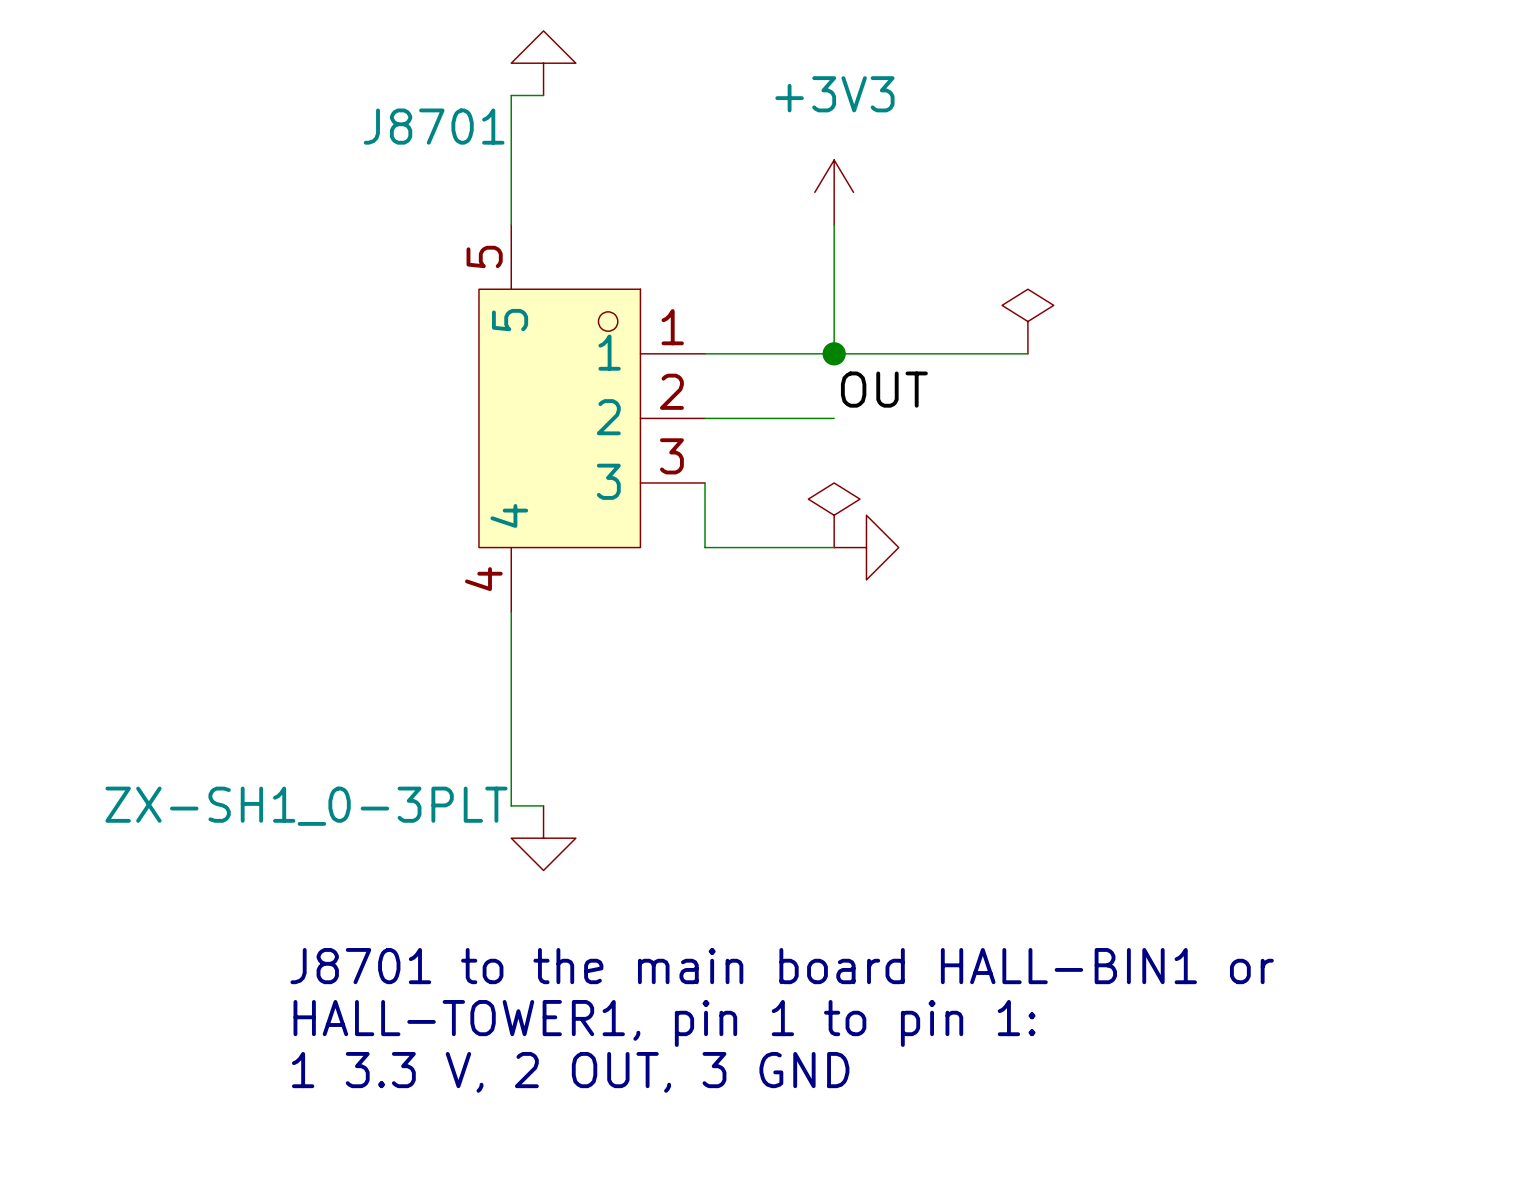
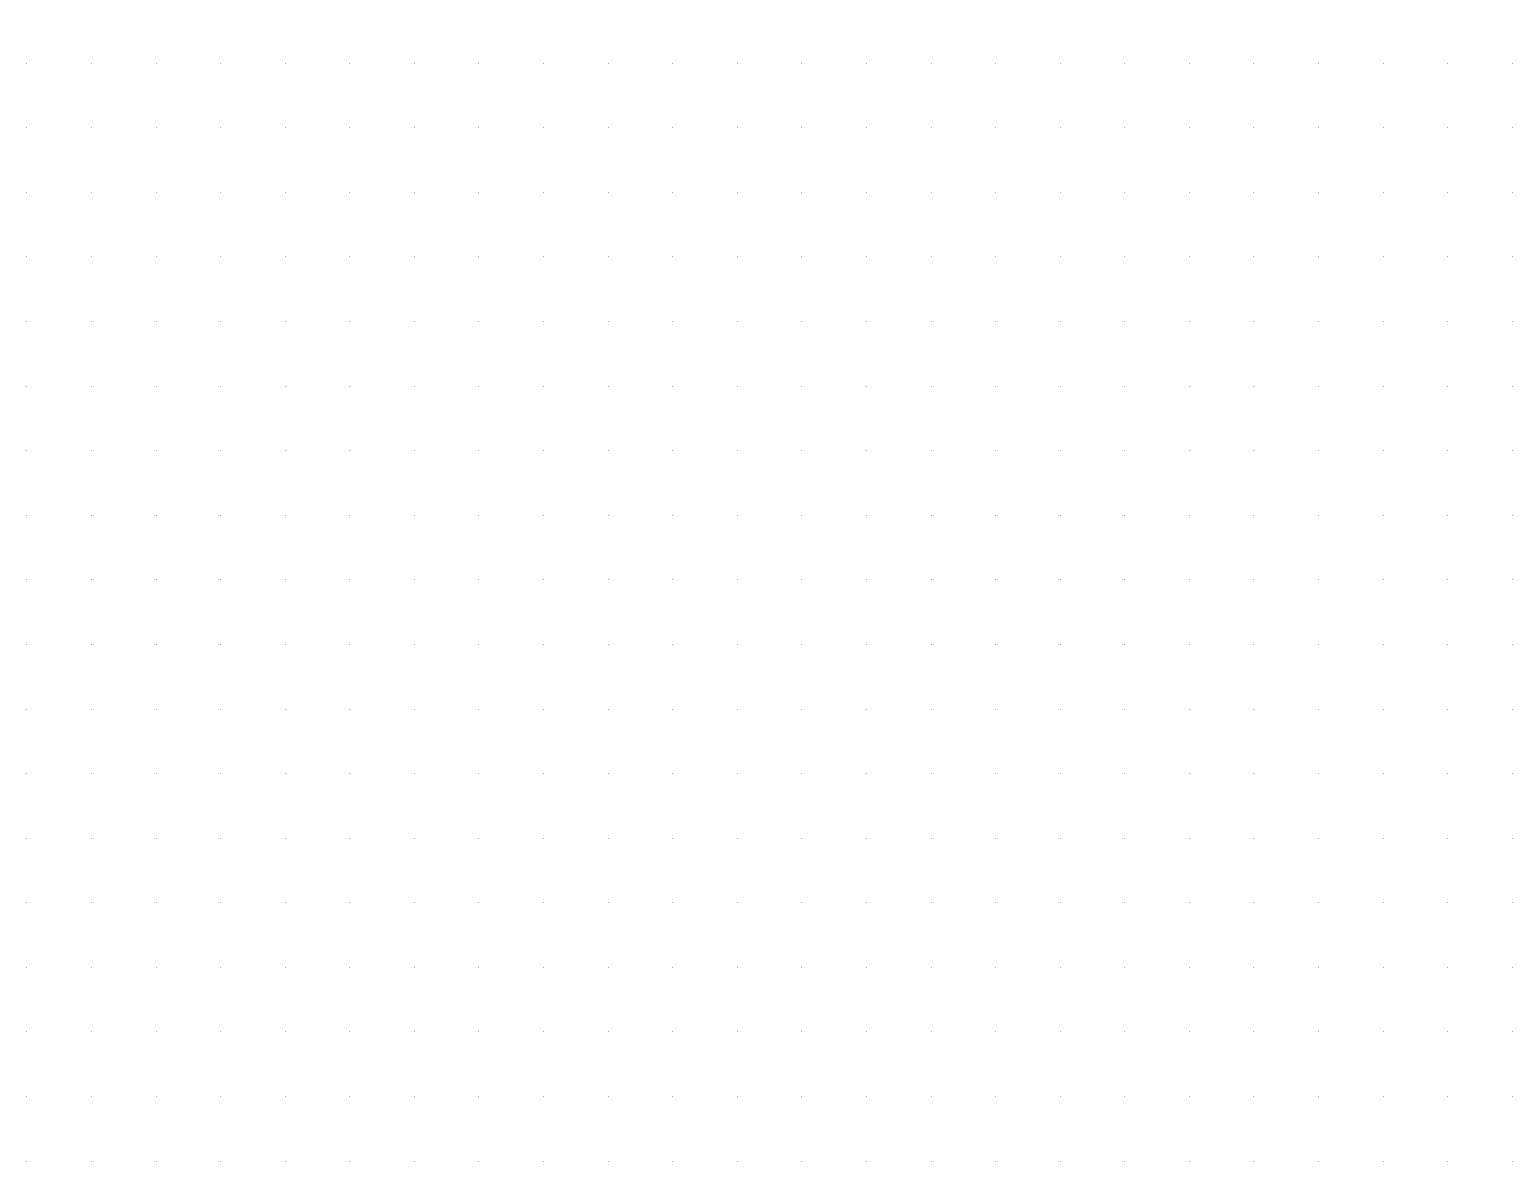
power symbol: (543, 63) -> none
wire: (543, 95) (511, 95) (511, 224) -> none
power symbol: +3V3 (834, 192) -> none
wire: (834, 224) (834, 353) -> none
power symbol: (1027, 321) -> none
wire: (705, 353) (1027, 353) -> none
junction: (834, 353) -> none
label: OUT (884, 389) -> none
J8701: ZX-SH1_0-3PLT (591, 418) -> none
wire: (705, 418) (834, 418) -> none
wire: (705, 482) (705, 547) (834, 547) -> none
power symbol: (834, 515) -> none
power symbol: (866, 547) -> none
wire: (511, 612) (511, 805) (543, 805) -> none
power symbol: (543, 838) -> none
text: J8701 to the main board HALL-BIN1 or (782, 966) -> none
text: HALL-TOWER1, pin 1 to pin 1: (664, 1023) -> none
text: 1 3.3 V, 2 OUT, 3 GND (570, 1072) -> none

